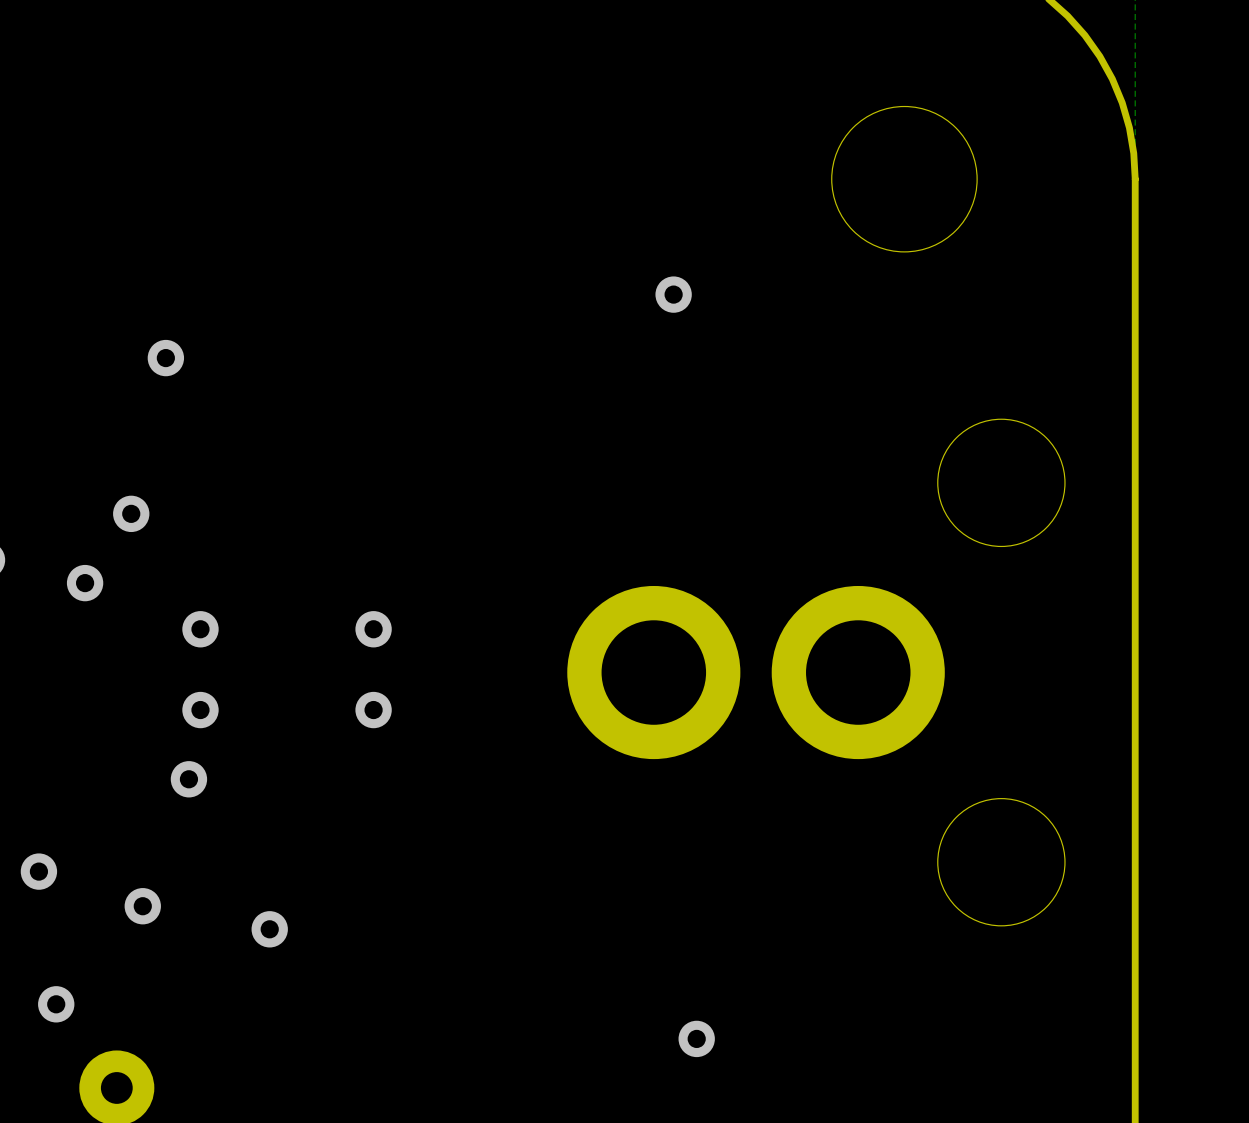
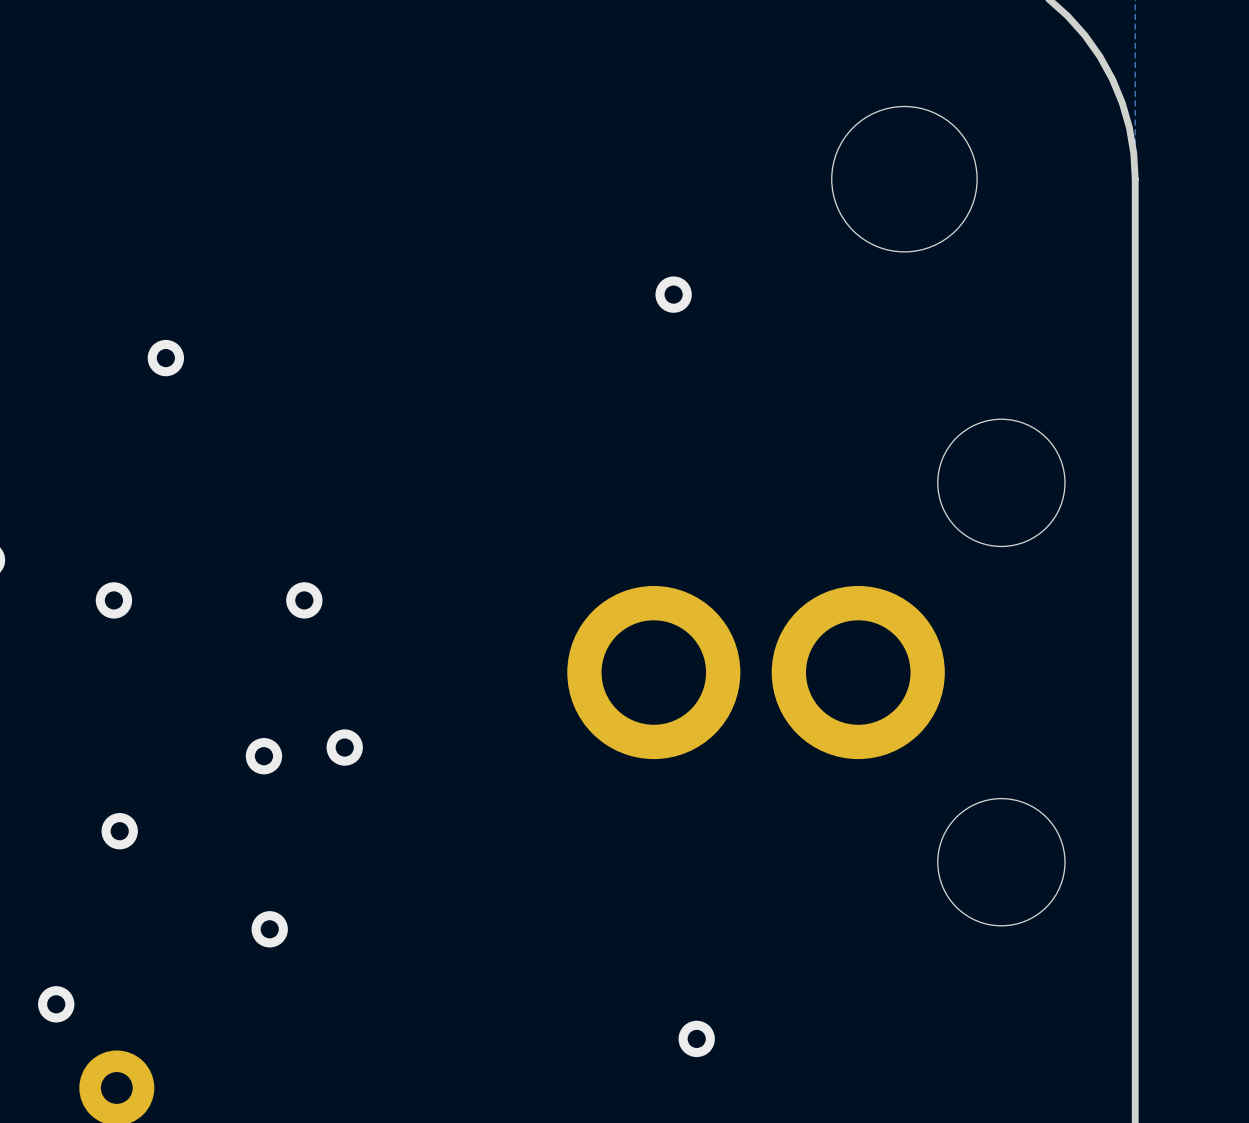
via: (131, 513) -> none
via position: (85, 583) -> (113, 600)
via: none -> (304, 600)
via: (200, 629) -> none
via: (373, 629) -> none
via: (200, 710) -> none
via position: (373, 710) -> (344, 747)
via: none -> (263, 756)
via: (188, 779) -> none
via: none -> (119, 831)
via: (38, 871) -> none
via: (142, 906) -> none

